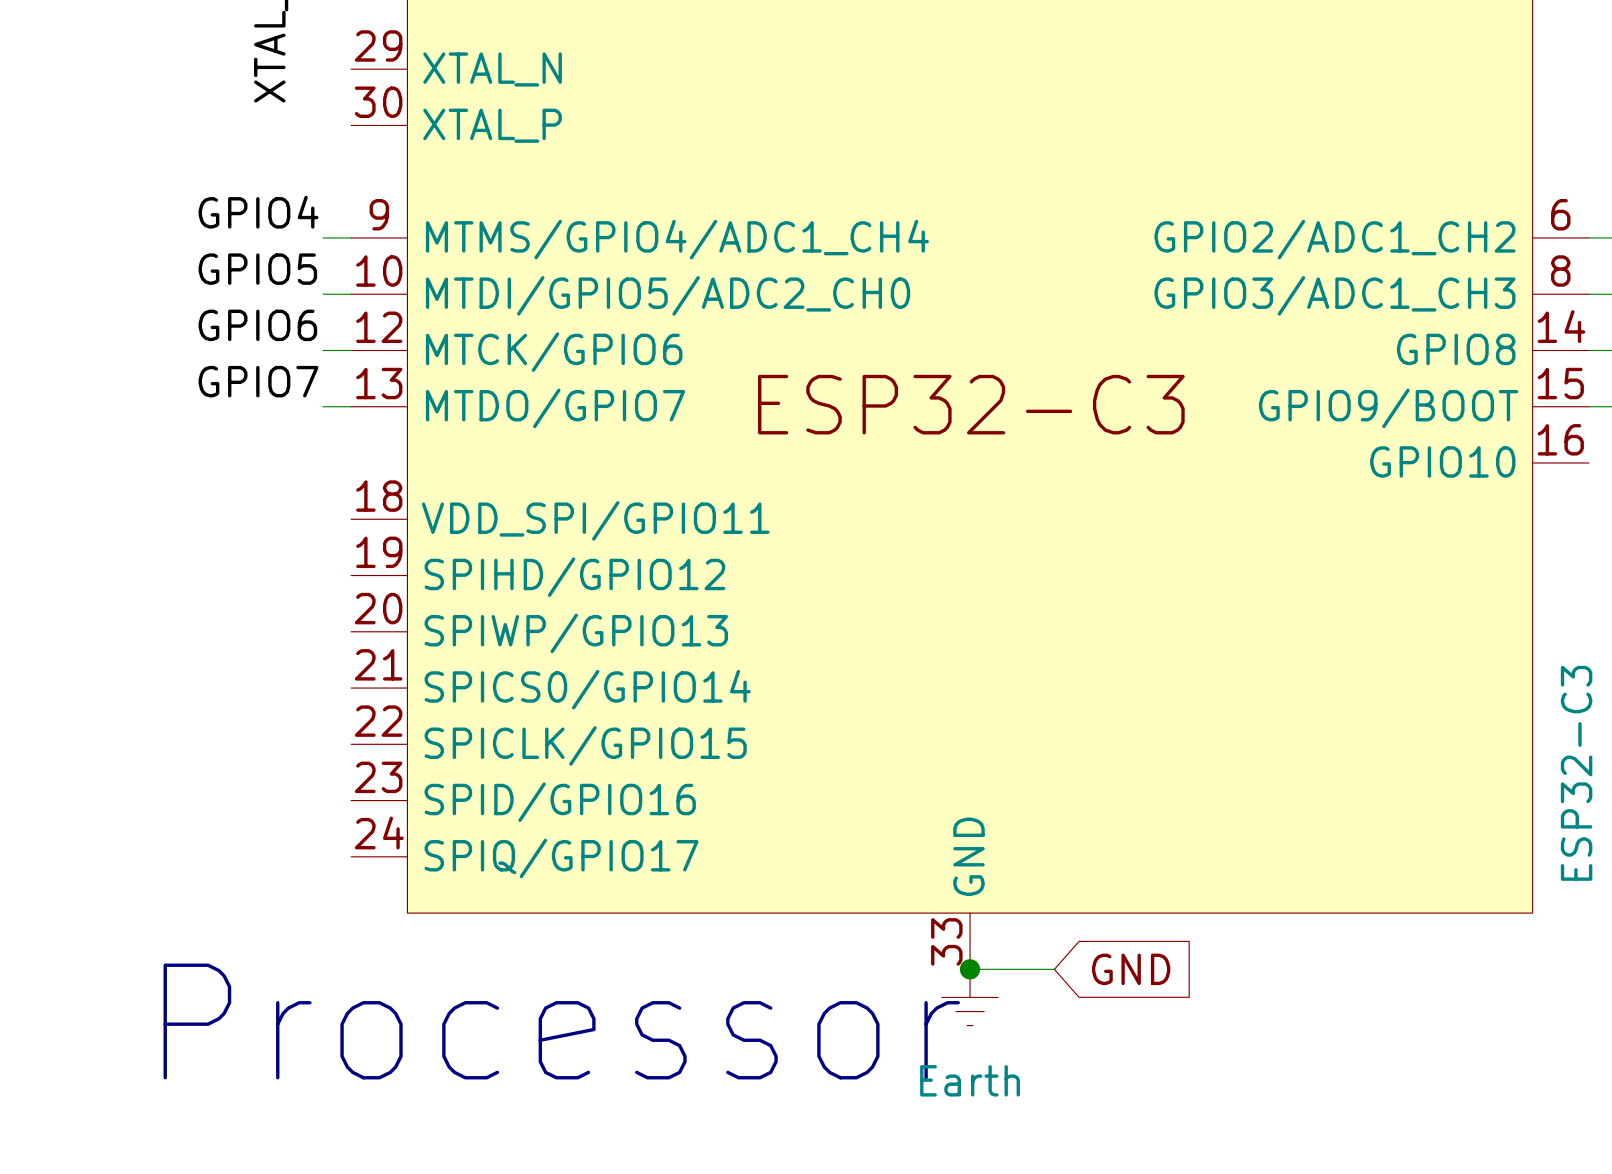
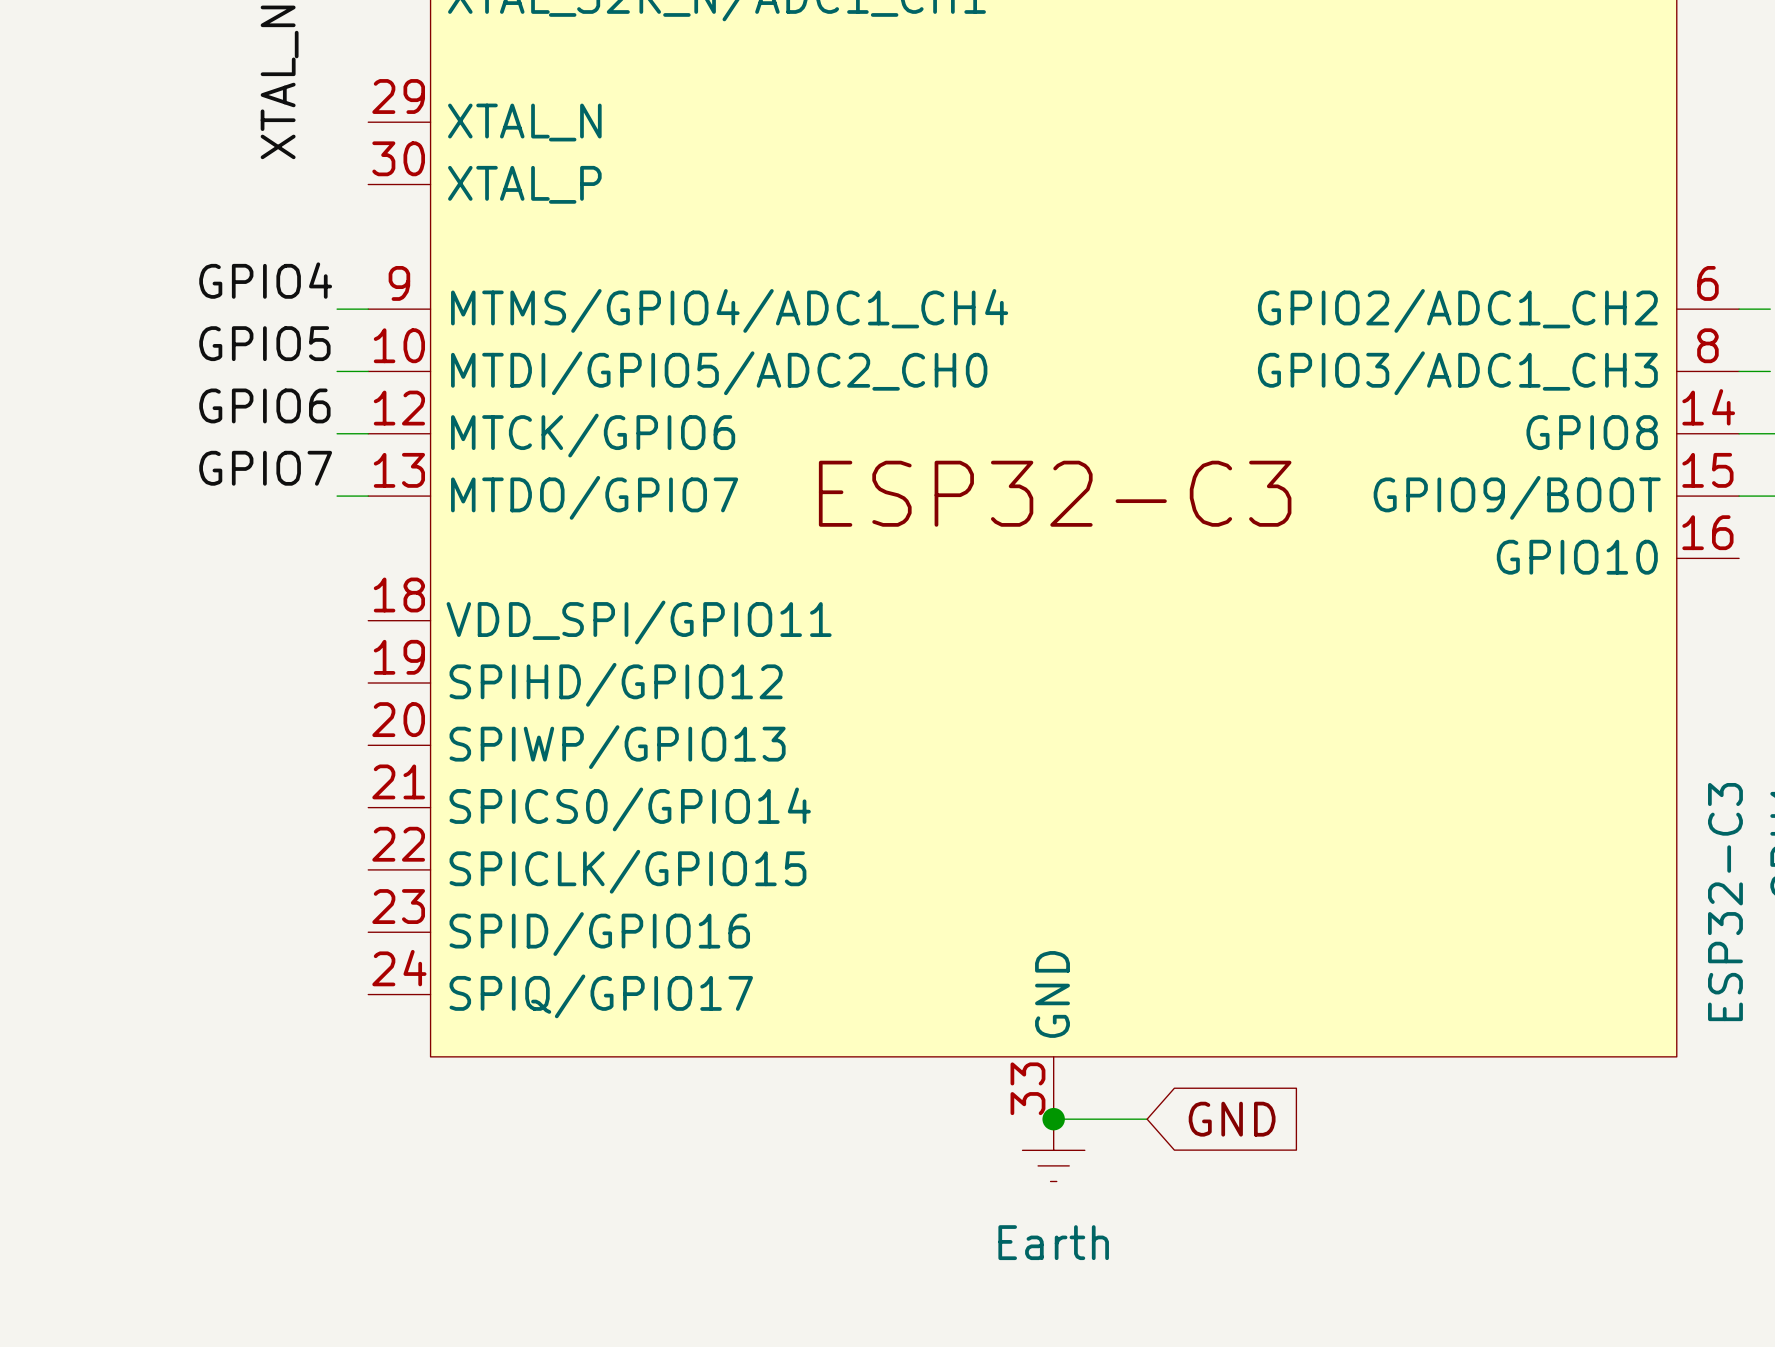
text: Processor (561, 1021) -> none

